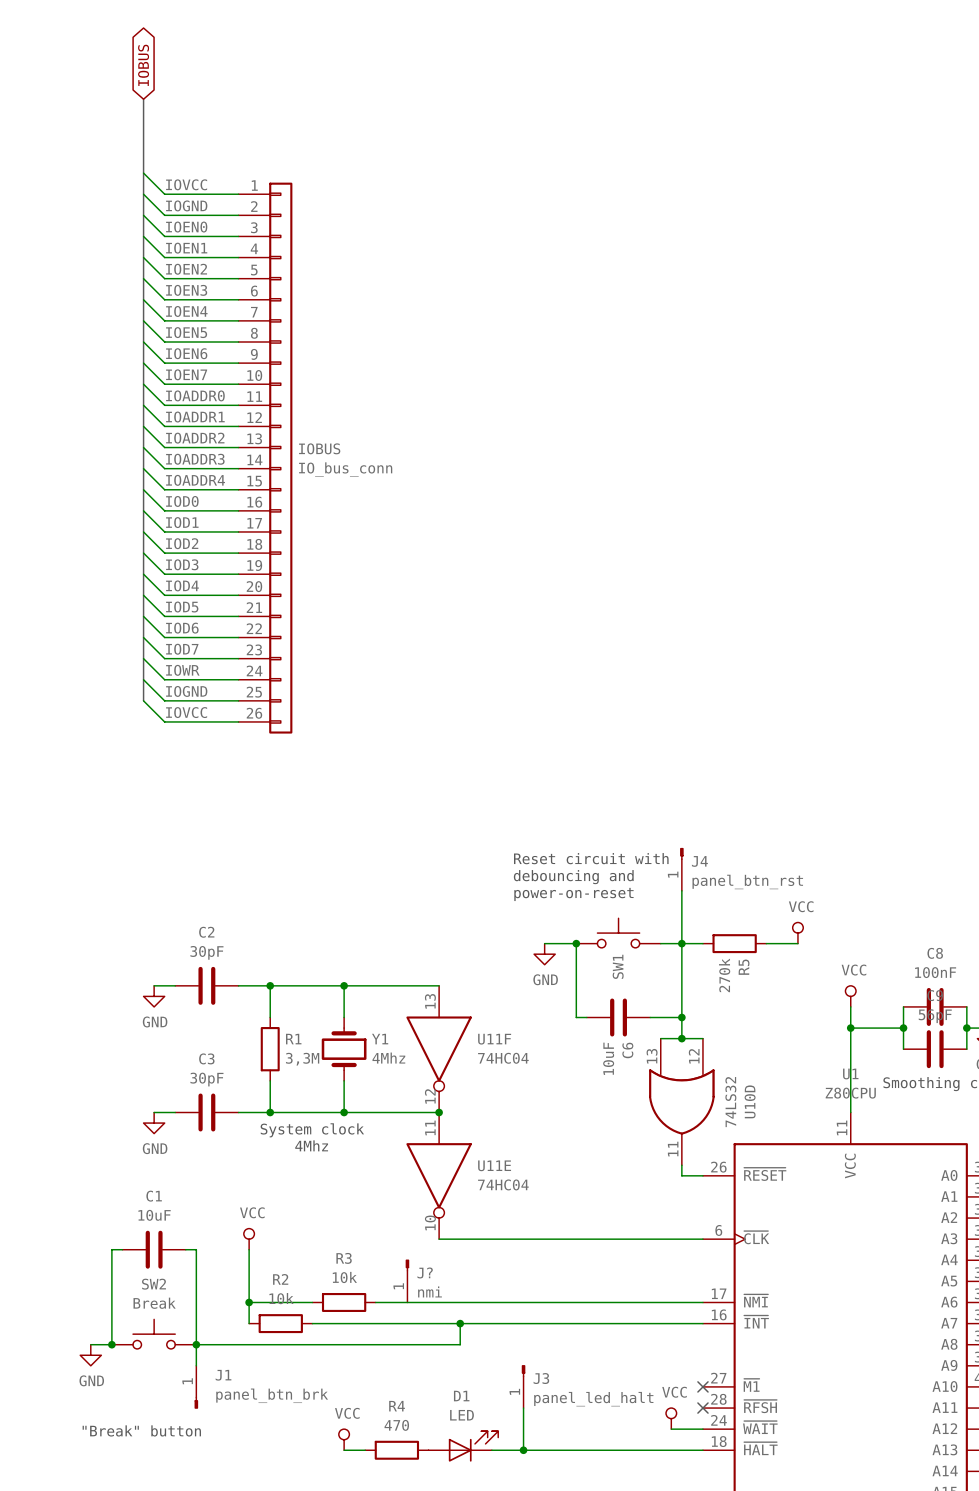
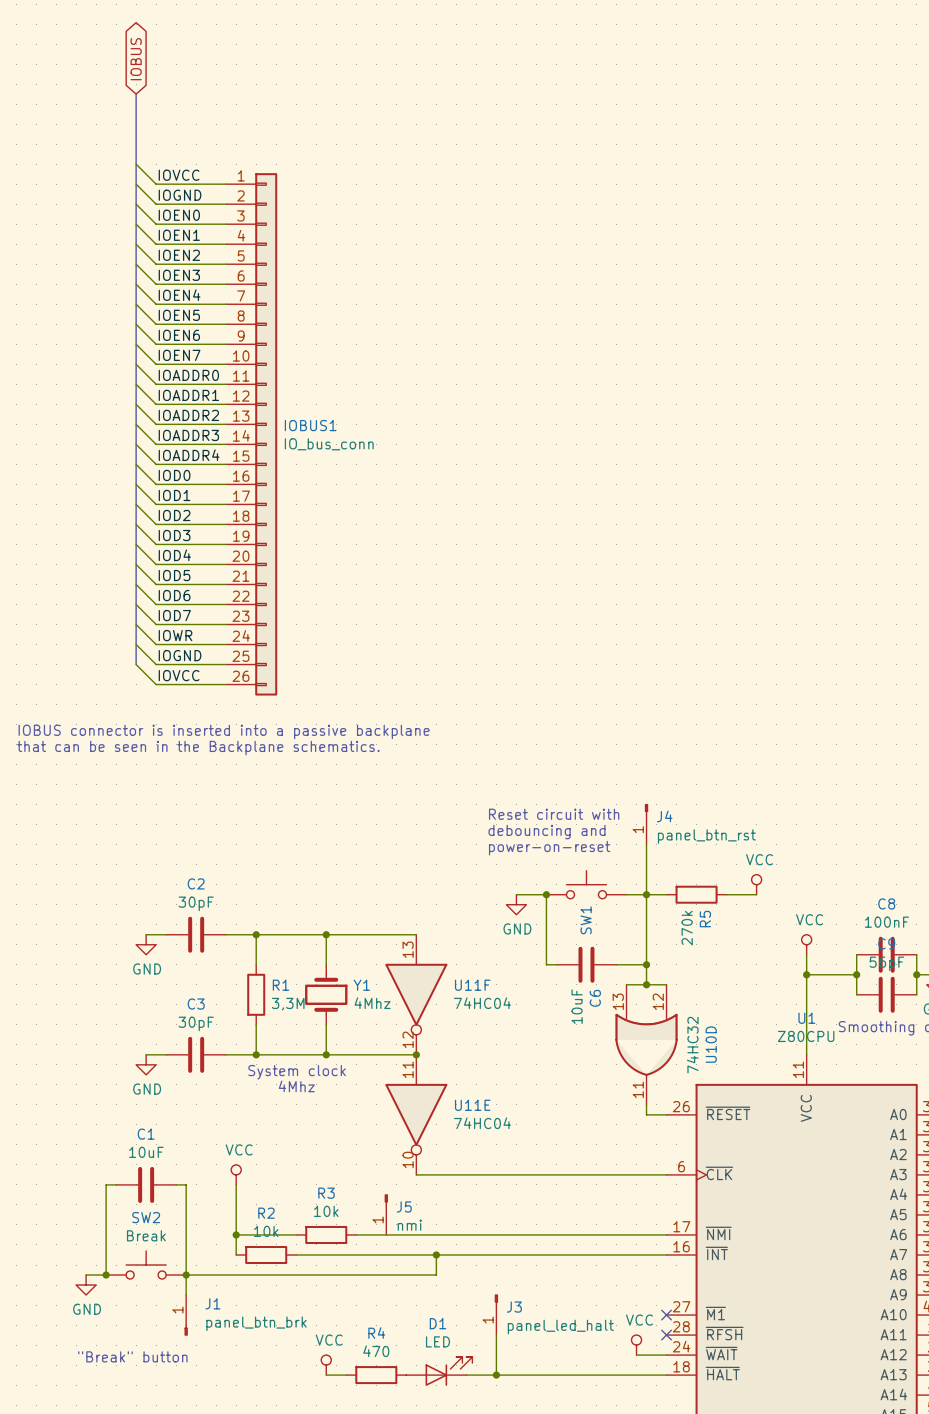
IOBUS name: IOBUS (319, 448) -> IOBUS1 (310, 425)
text: none -> IOBUS connector is inserted into a passive backplane (224, 731)
text: none -> that can be seen in the Backplane schematics. (198, 748)
U10D value: 74LS32 (730, 1102) -> 74HC32 (692, 1045)
J? name: J? (425, 1272) -> J5 (404, 1206)

